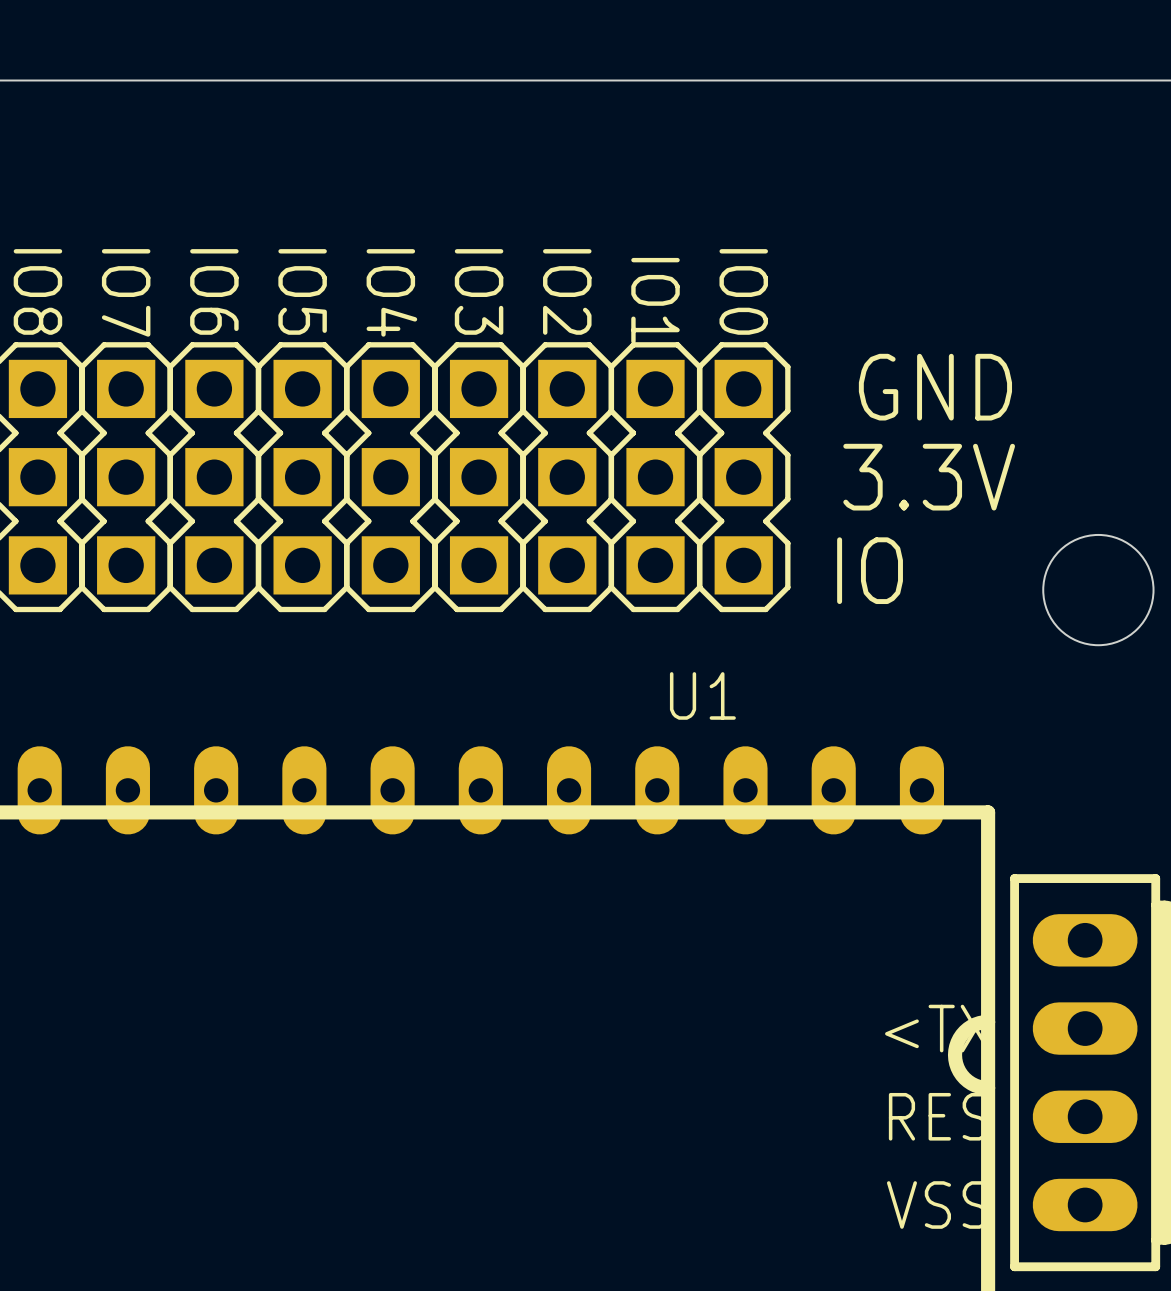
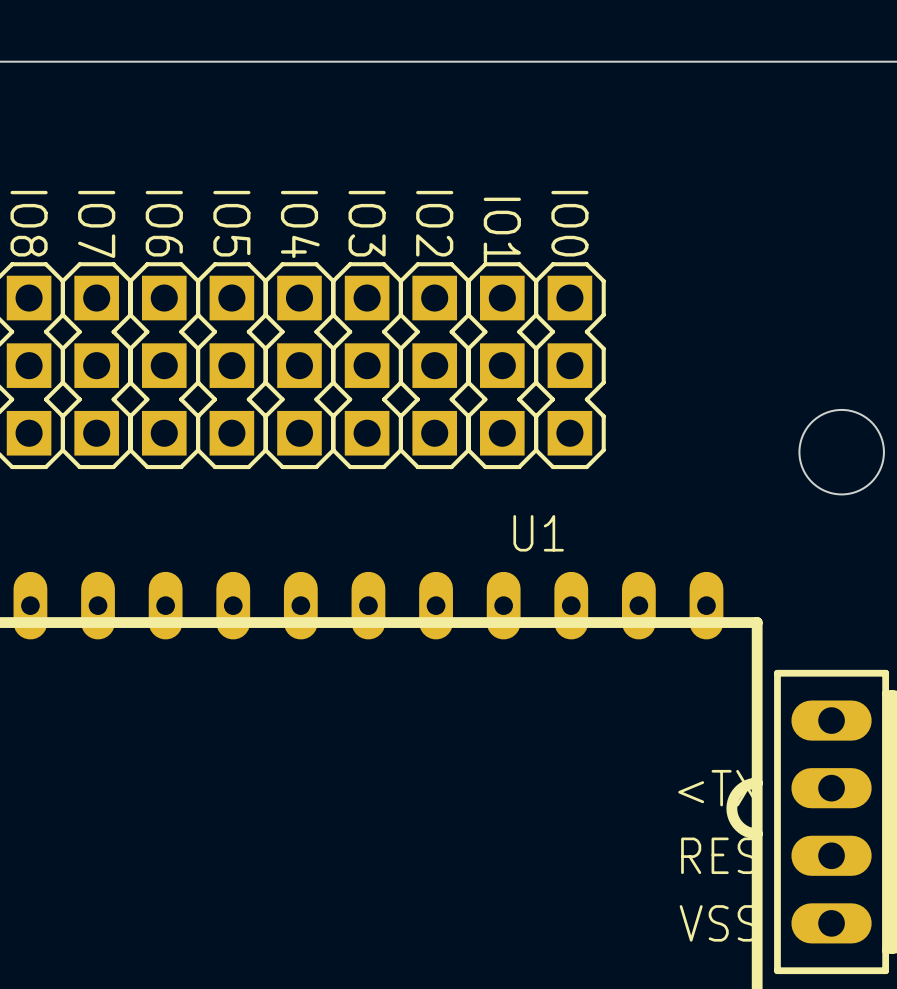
text: GND (935, 387) -> none
text: 3.3V (929, 477) -> none
text: IO (870, 570) -> none

